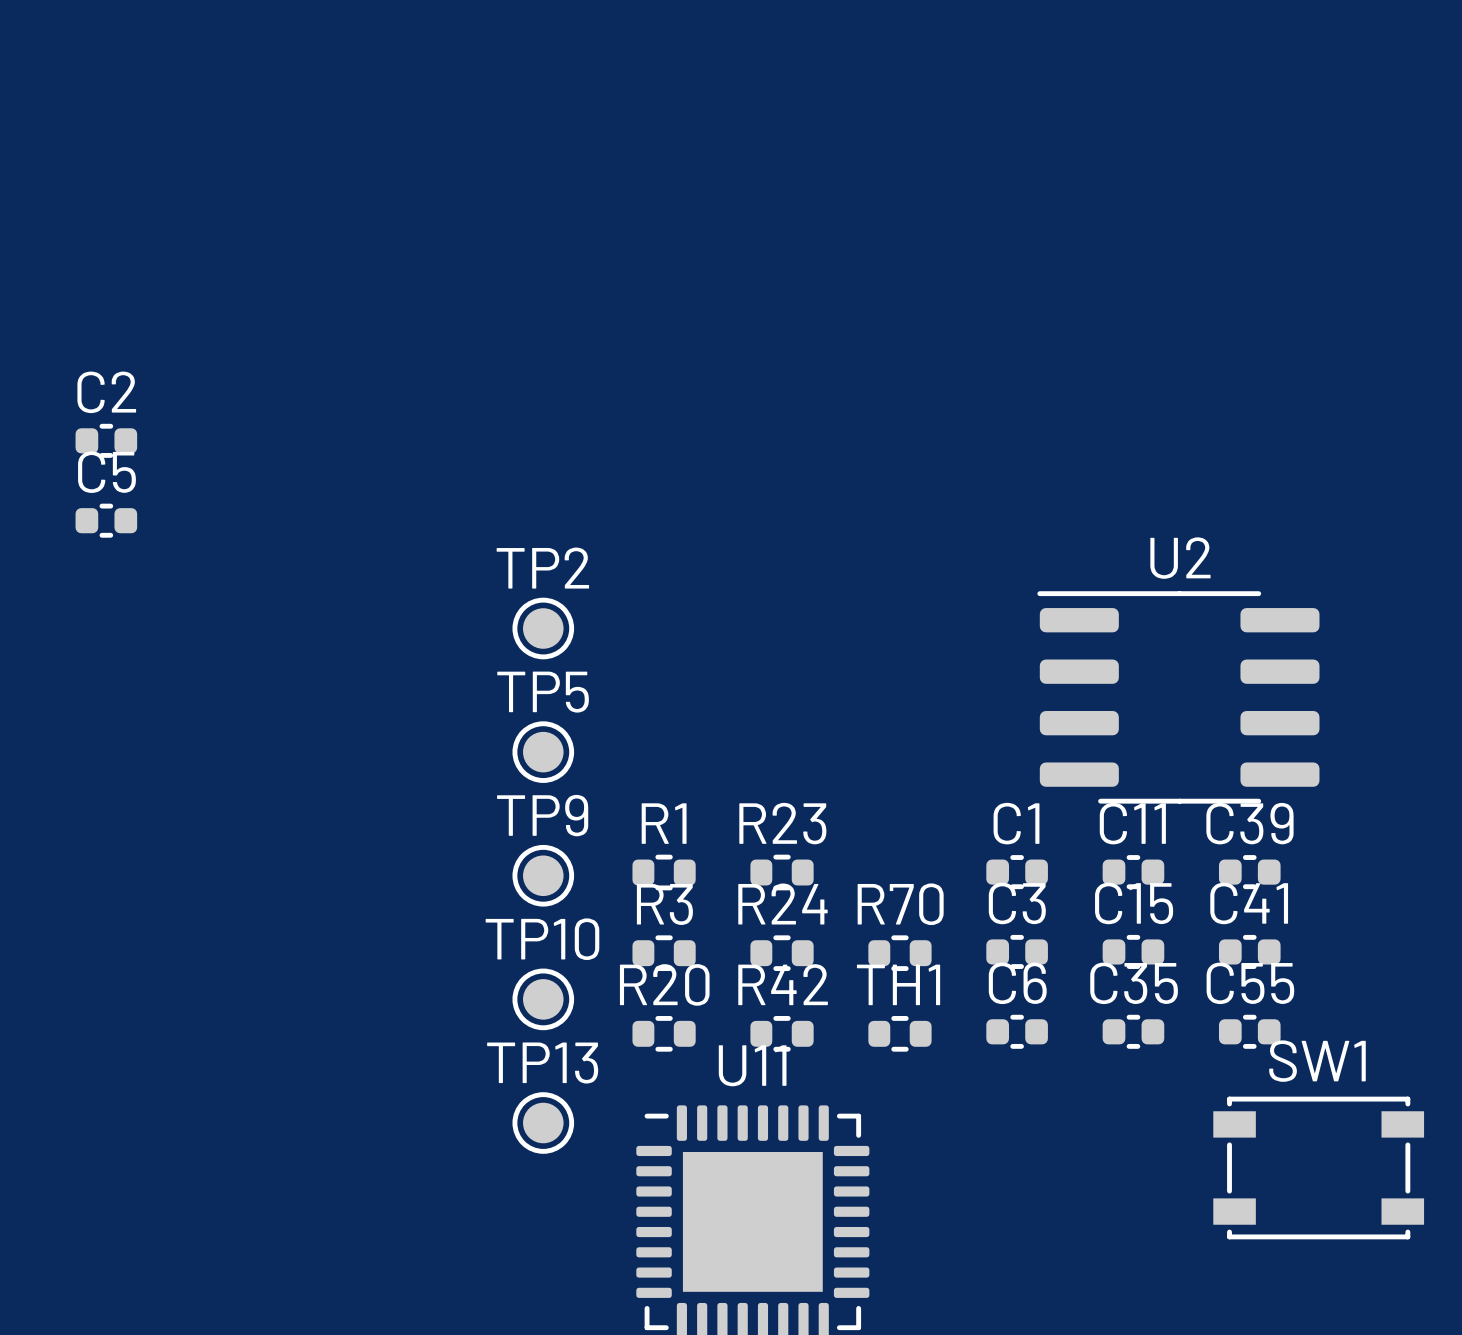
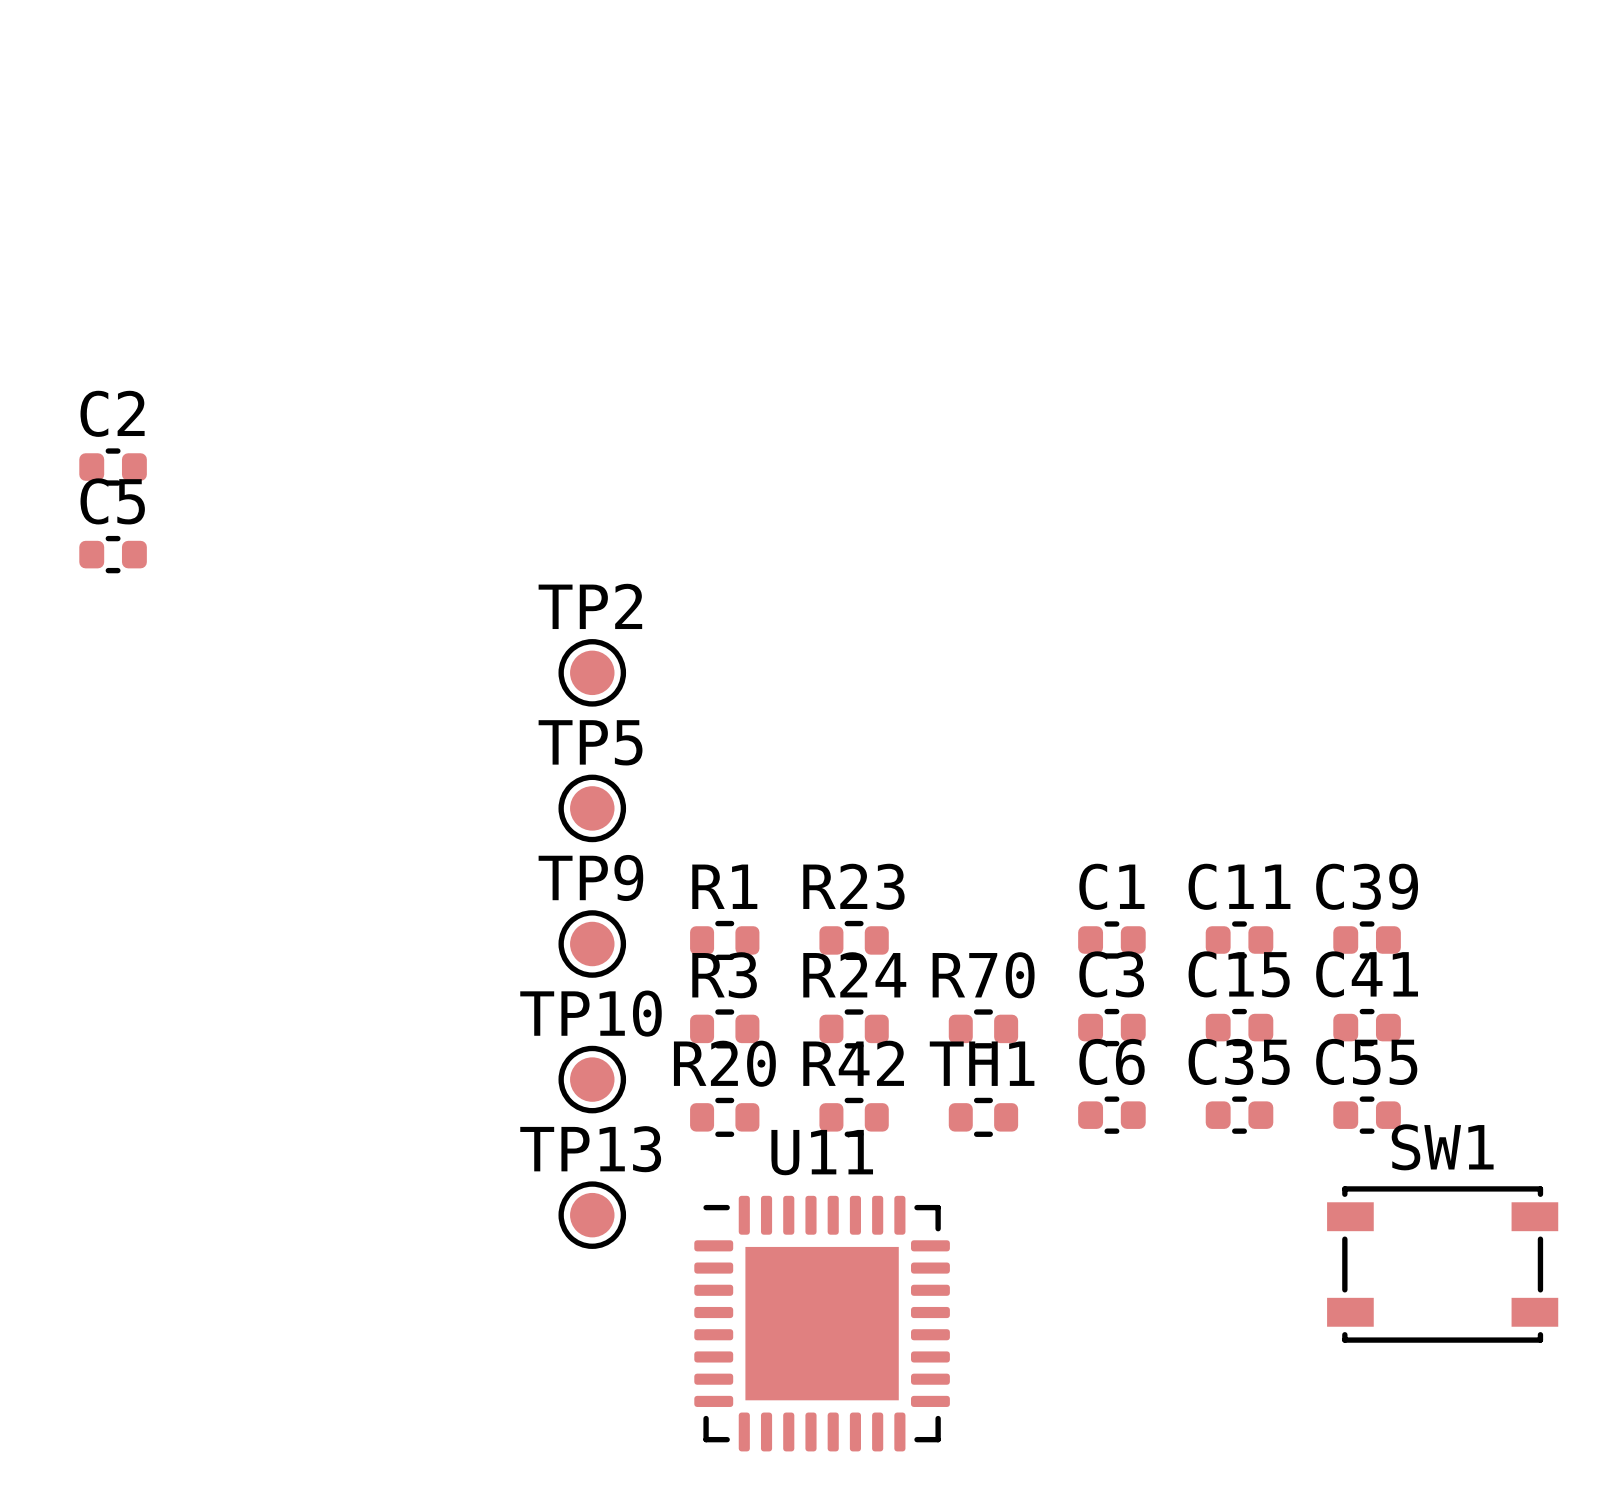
U2: (1178, 697) -> none

